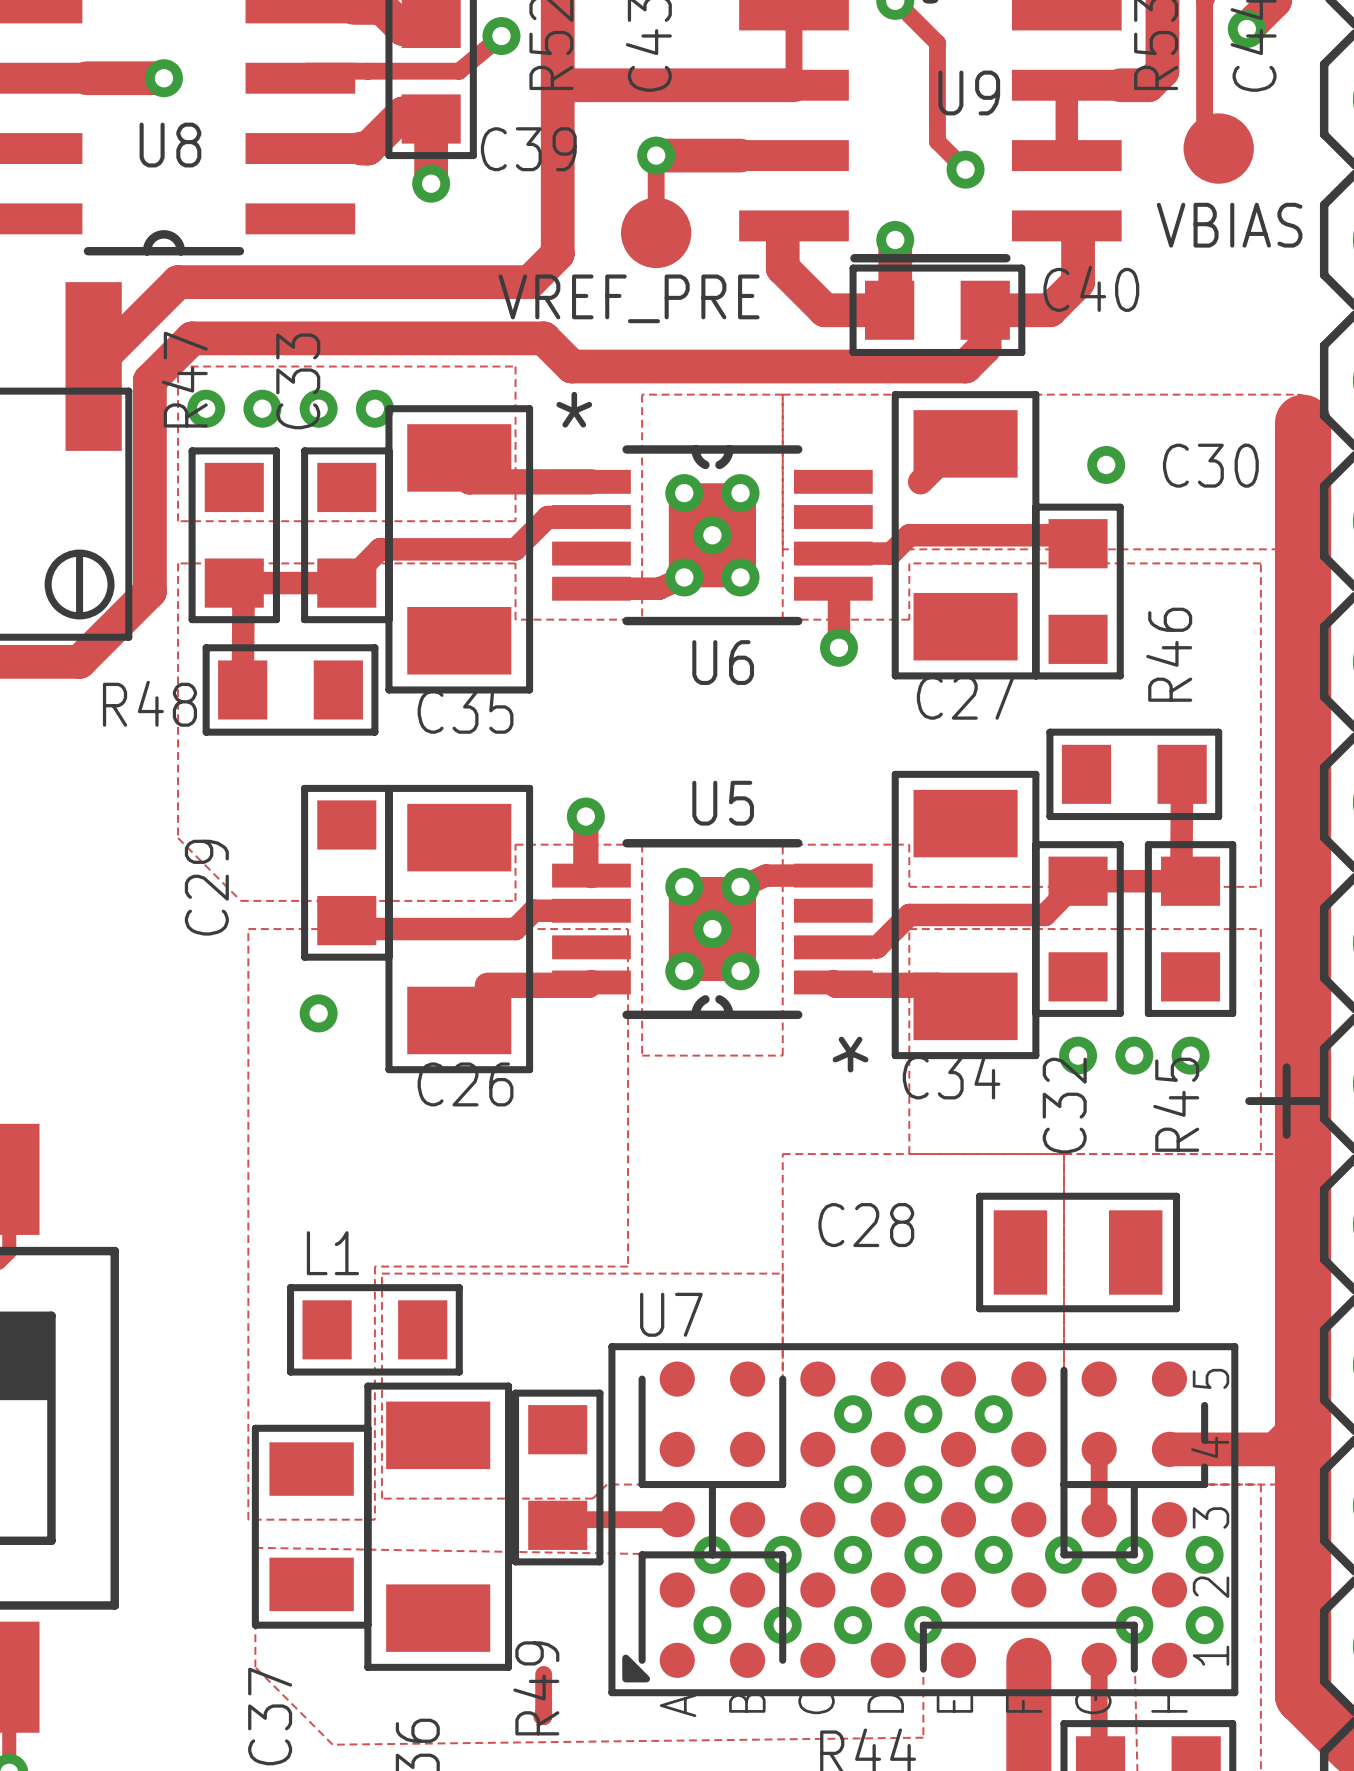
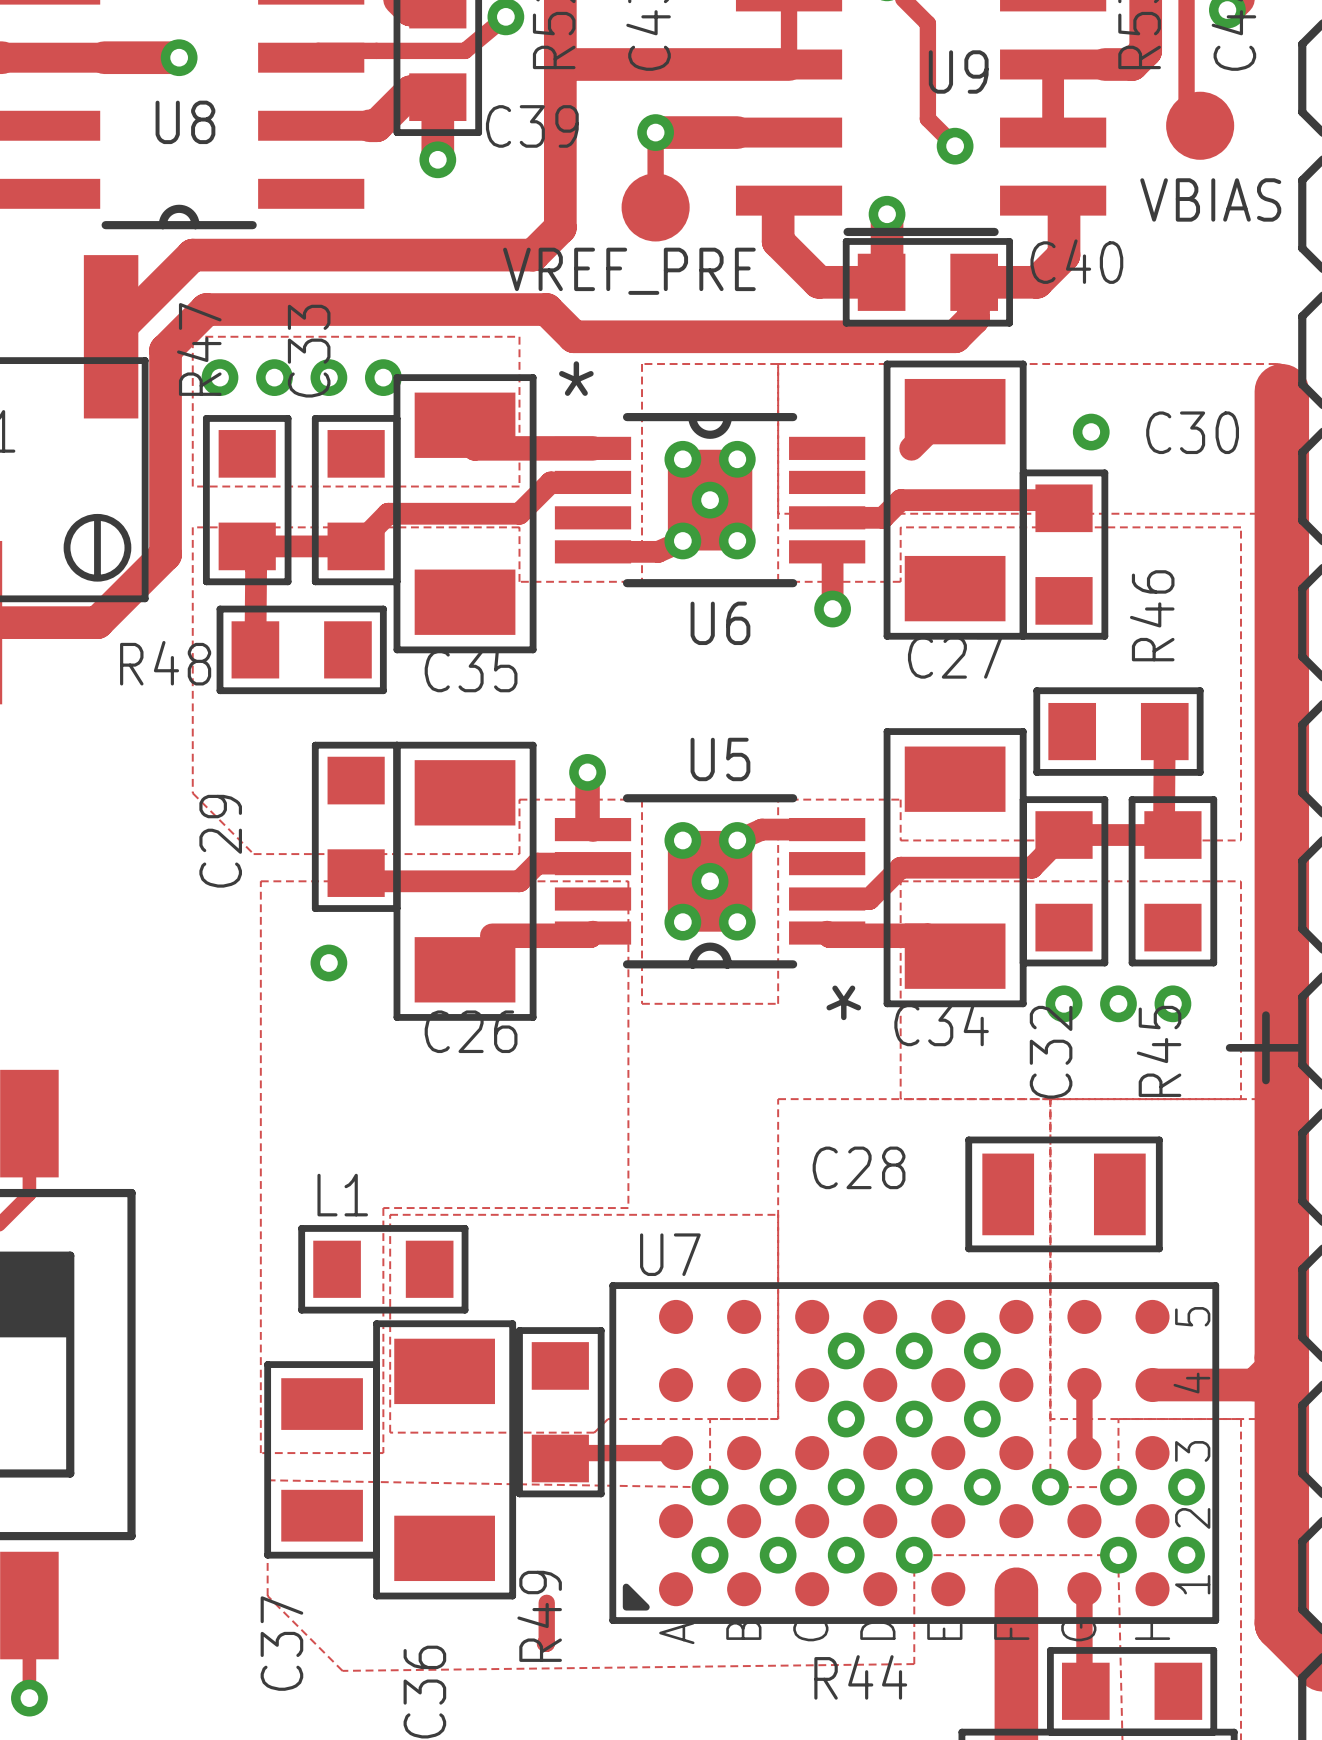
U6 footprint: [552, 445, 873, 626] -> [554, 413, 866, 588]
U5 footprint: [552, 839, 873, 1020] -> [554, 794, 866, 969]
U7 footprint: [608, 1343, 1239, 1697] -> [609, 1282, 1220, 1624]

